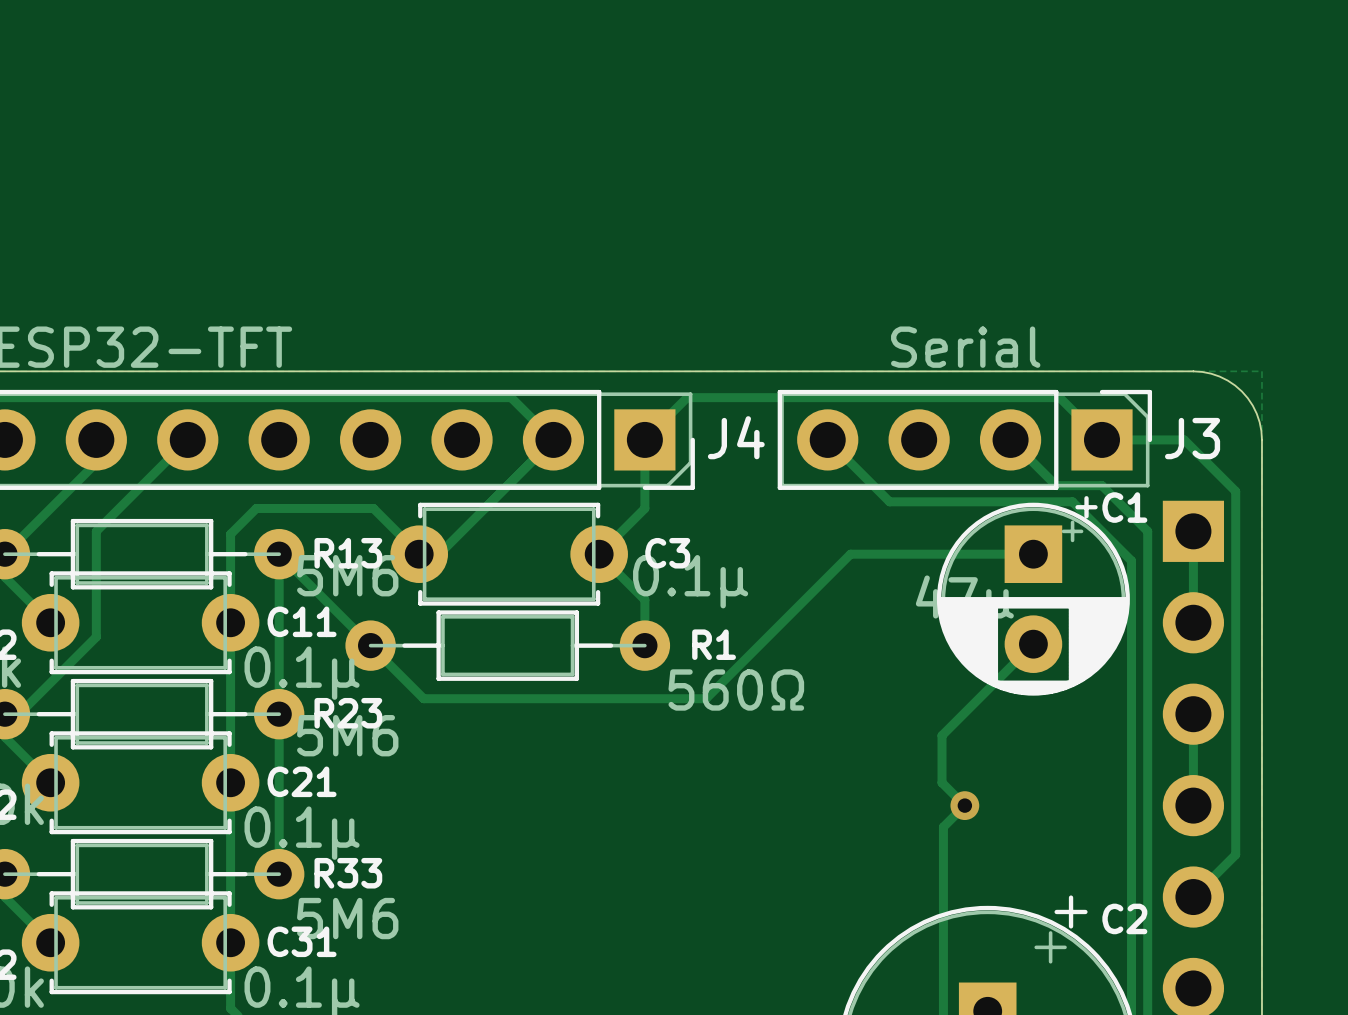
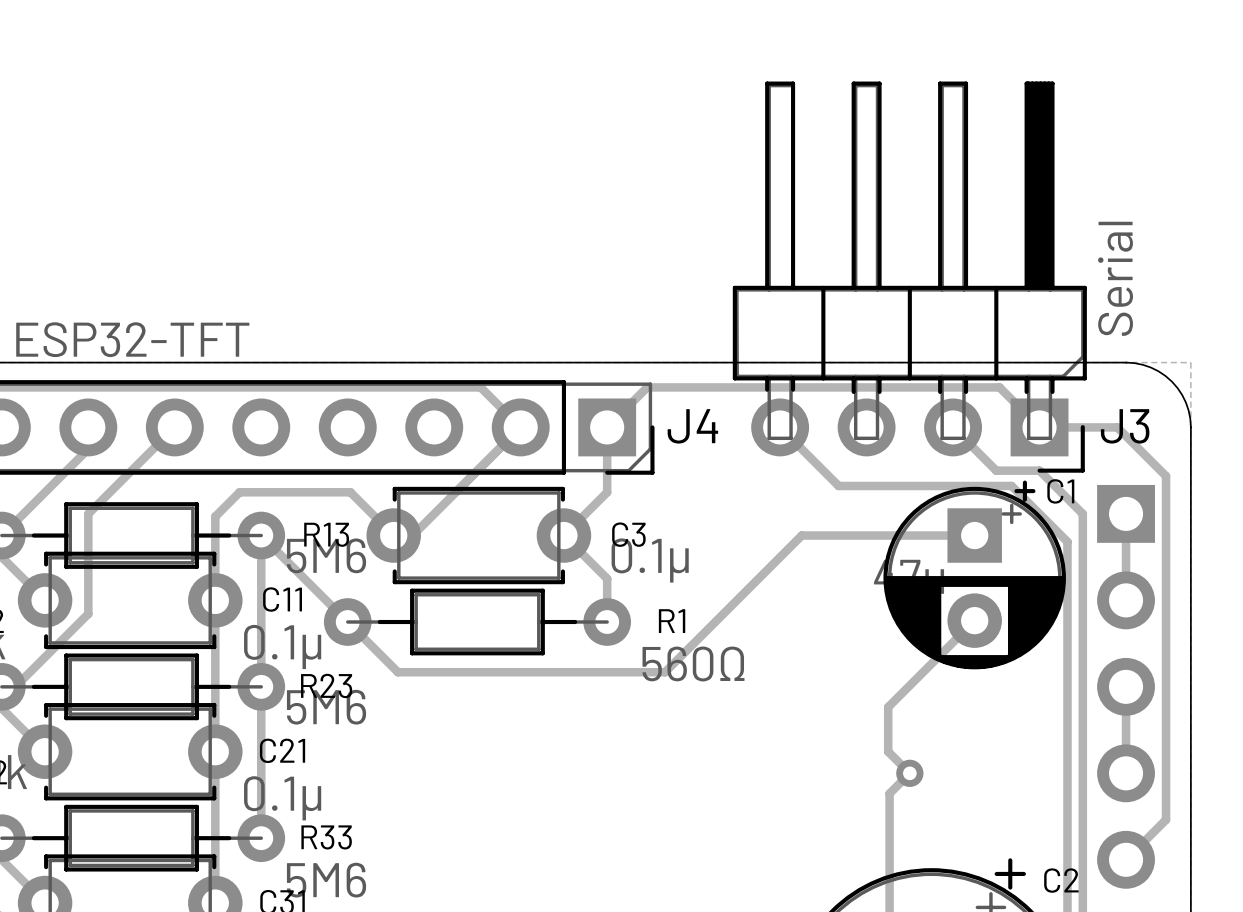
J3 value position: Serial (965, 347) -> Serial (1115, 278)
J3 footprint: [777, 389, 1153, 490] -> [732, 81, 1087, 473]

